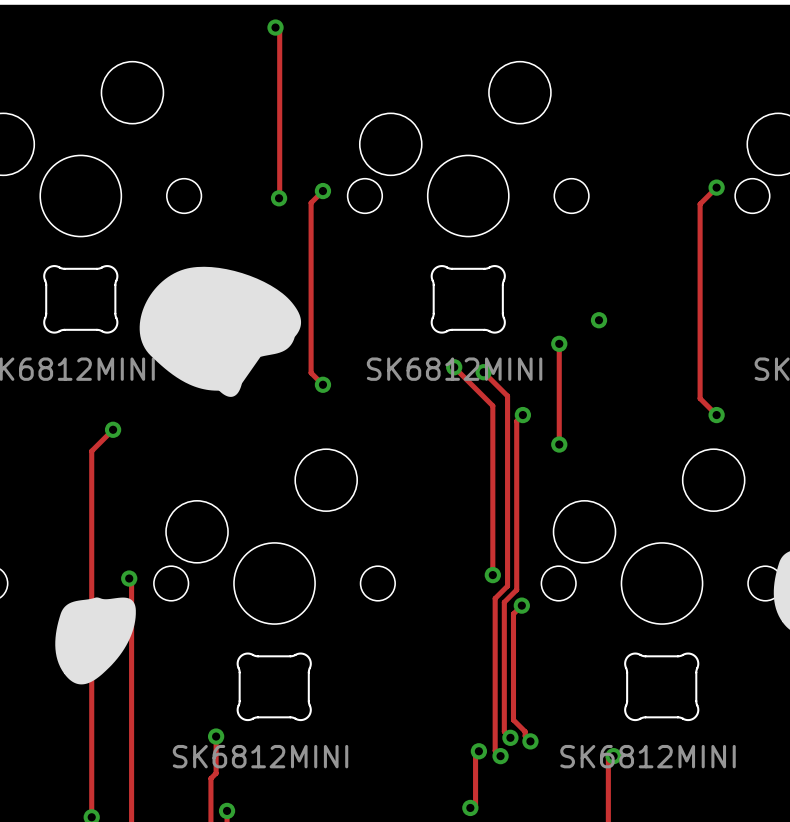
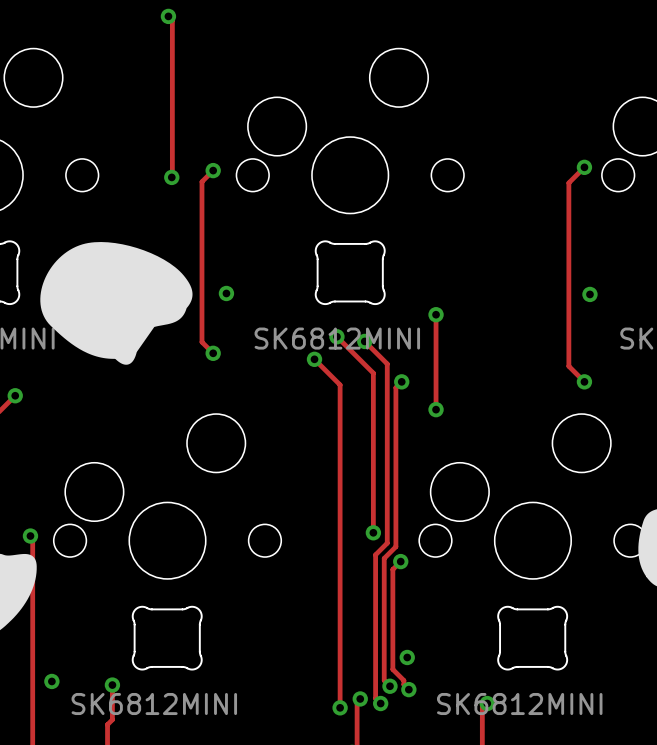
via: (599, 320) -> none
via: none -> (226, 293)
via: none -> (589, 294)
track: none -> (314, 359) (340, 384) (340, 707)
via: none -> (314, 359)
via: none -> (407, 657)
via: none -> (51, 681)
via: none -> (340, 707)

